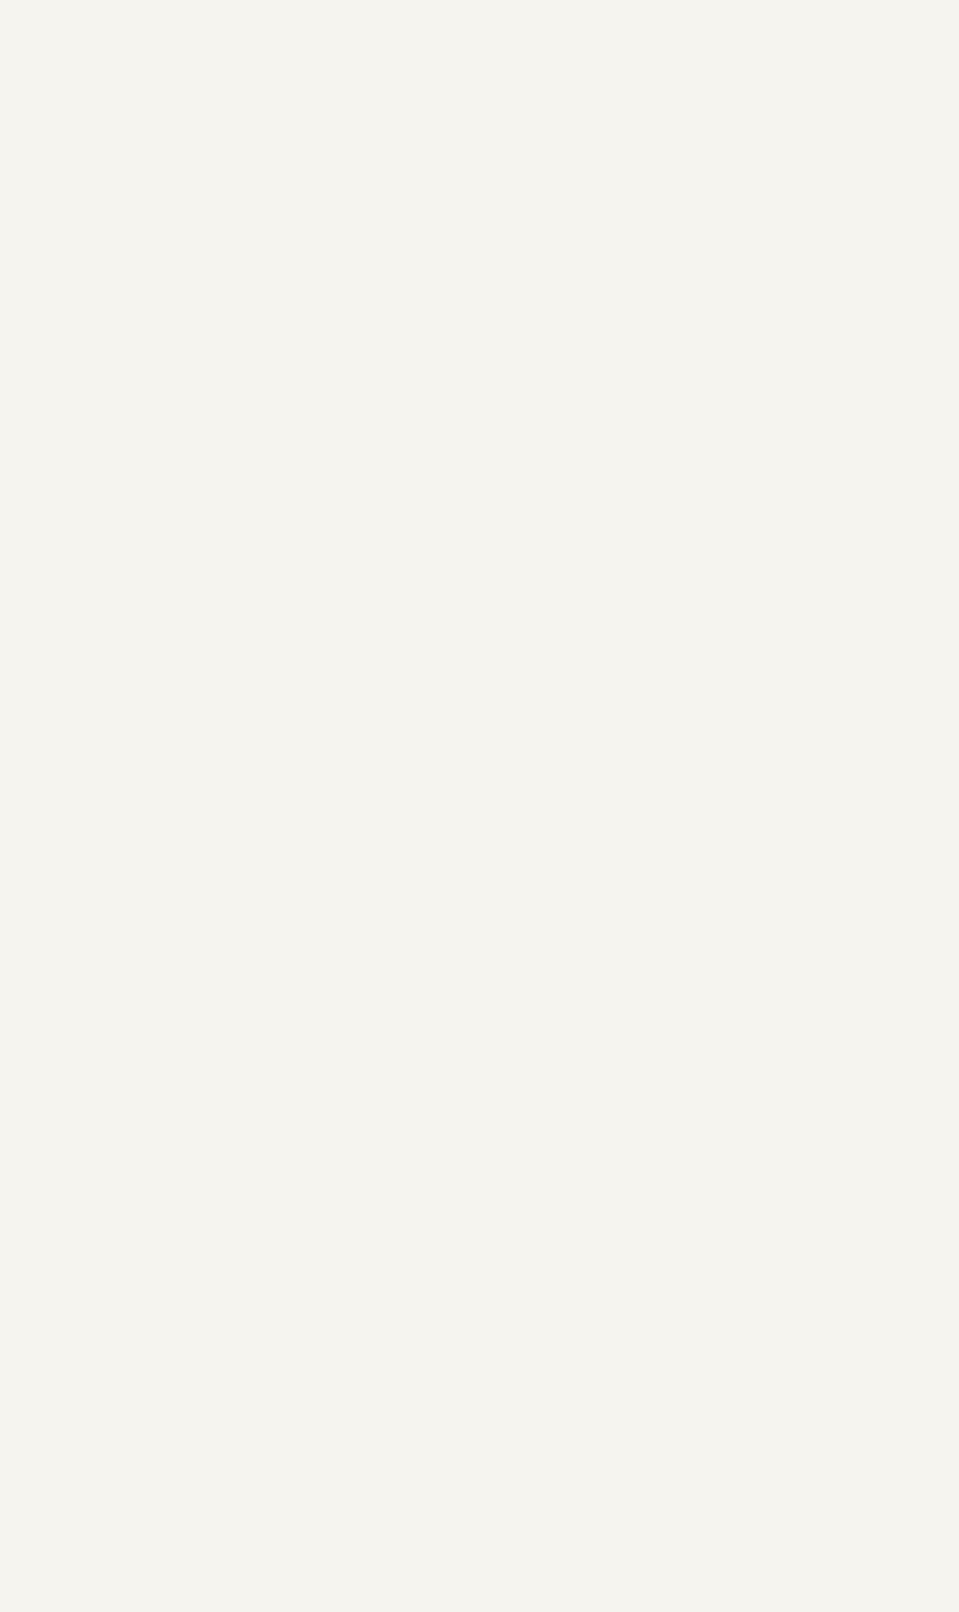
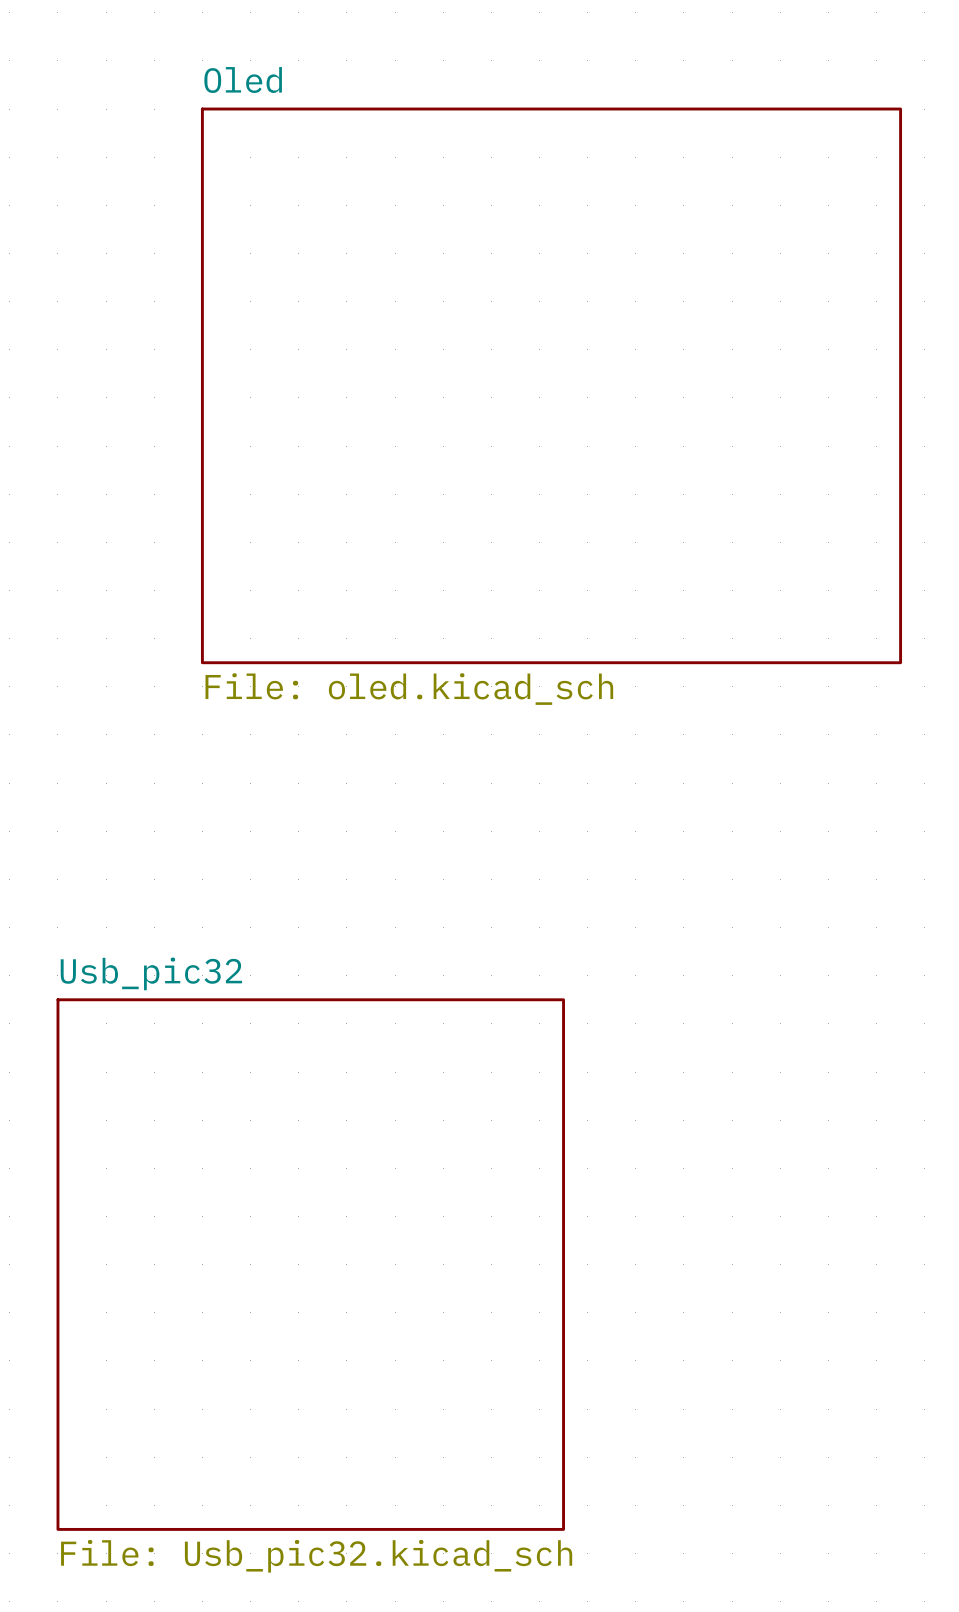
sheet Oled: none -> File: oled.kicad_sch (551, 385)
sheet Usb_pic32: none -> File: Usb_pic32.kicad_sch (310, 1264)

